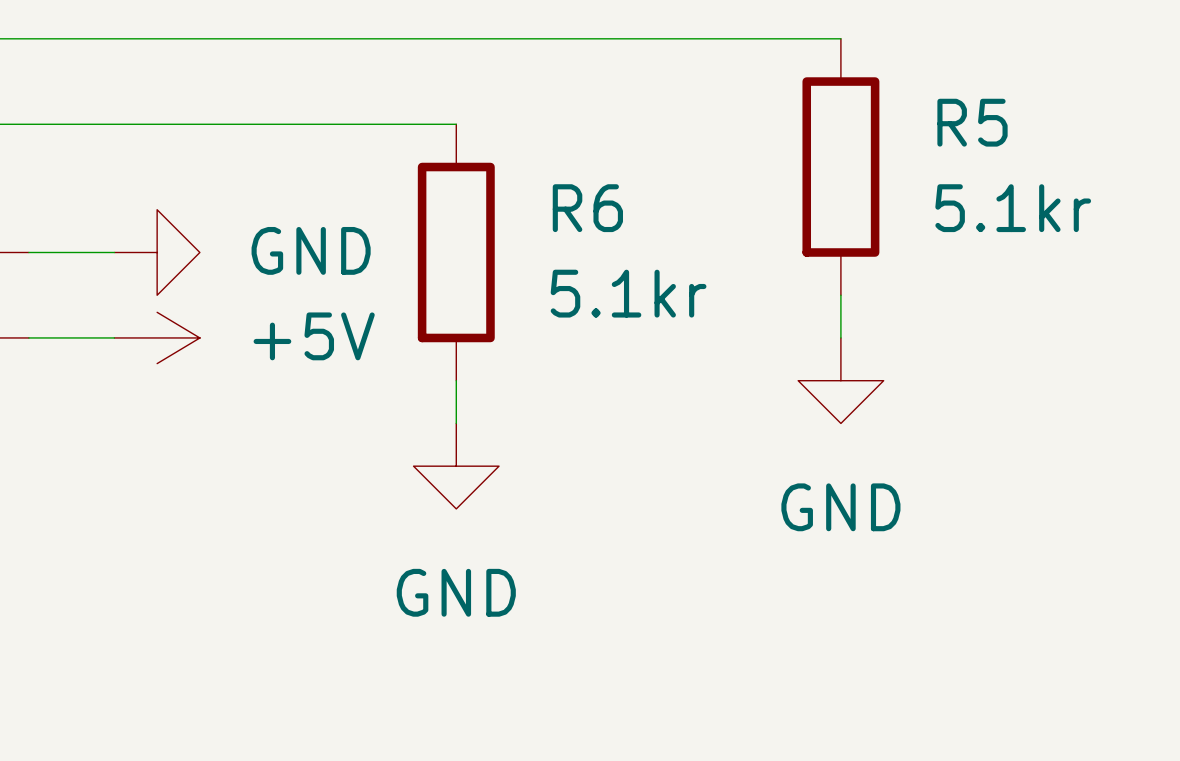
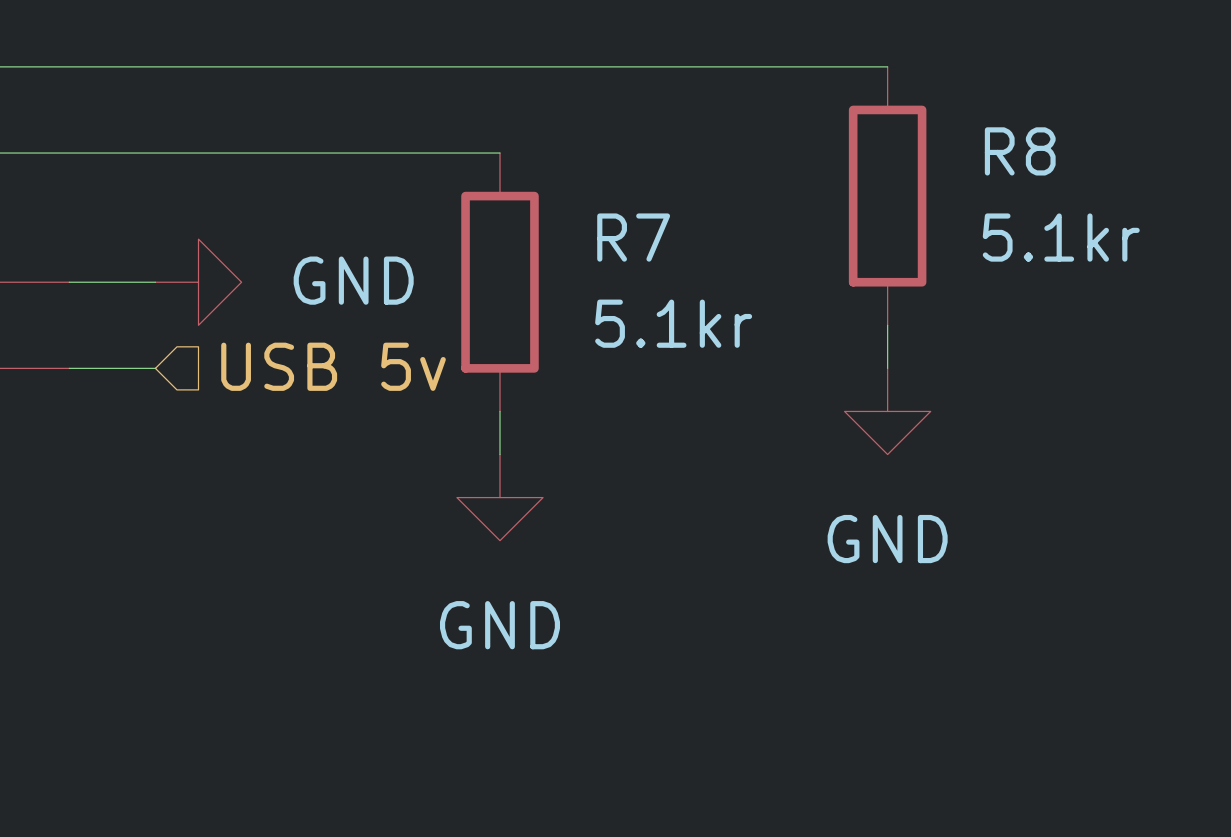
R5 name: R5 (972, 122) -> R8 (1020, 151)
R6 name: R6 (587, 208) -> R7 (633, 237)
hierarchical label: none -> USB 5v (333, 366)
power symbol: +5V (157, 337) -> none

